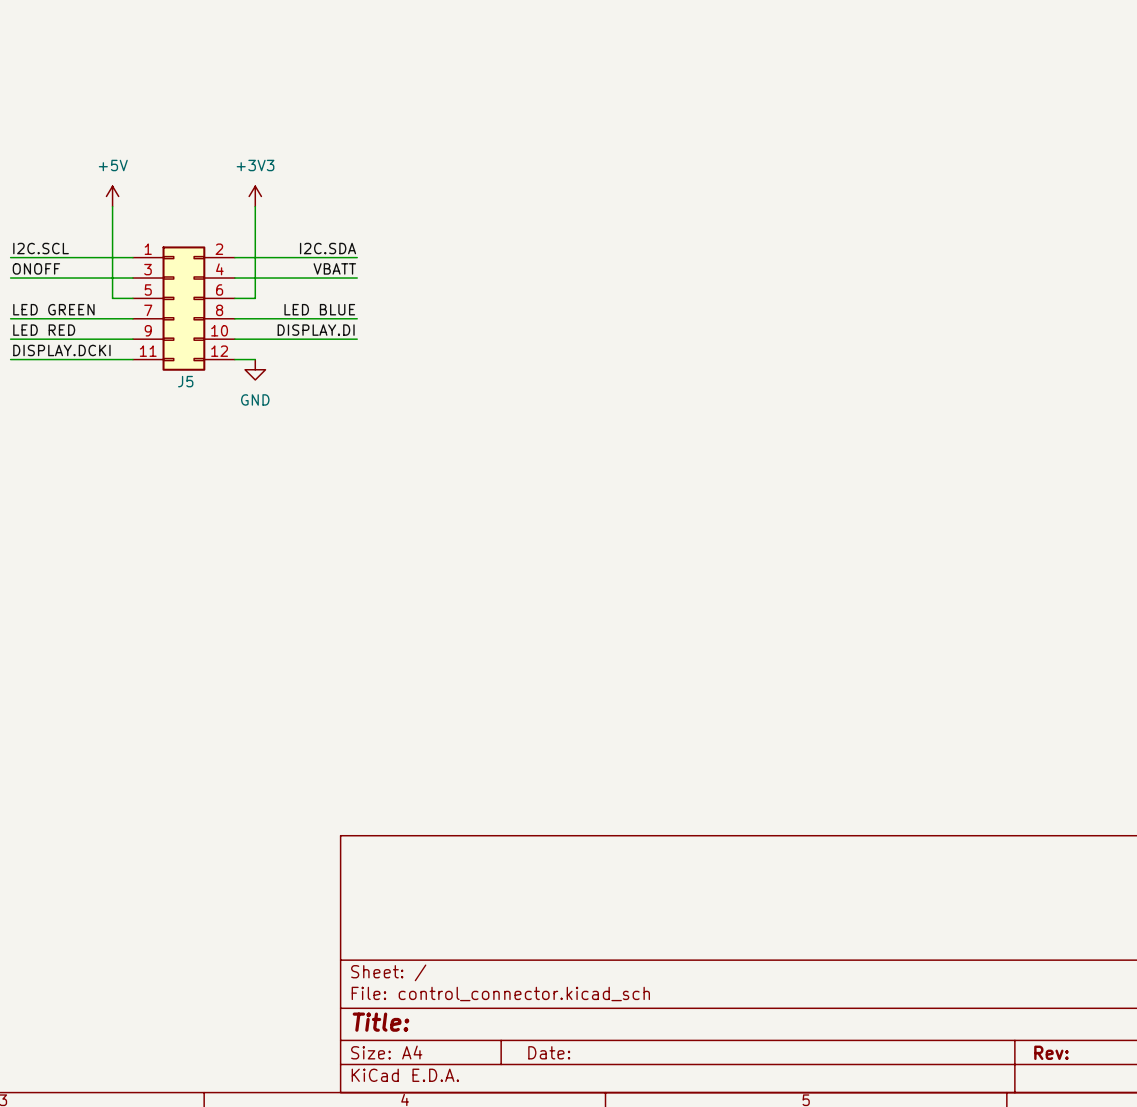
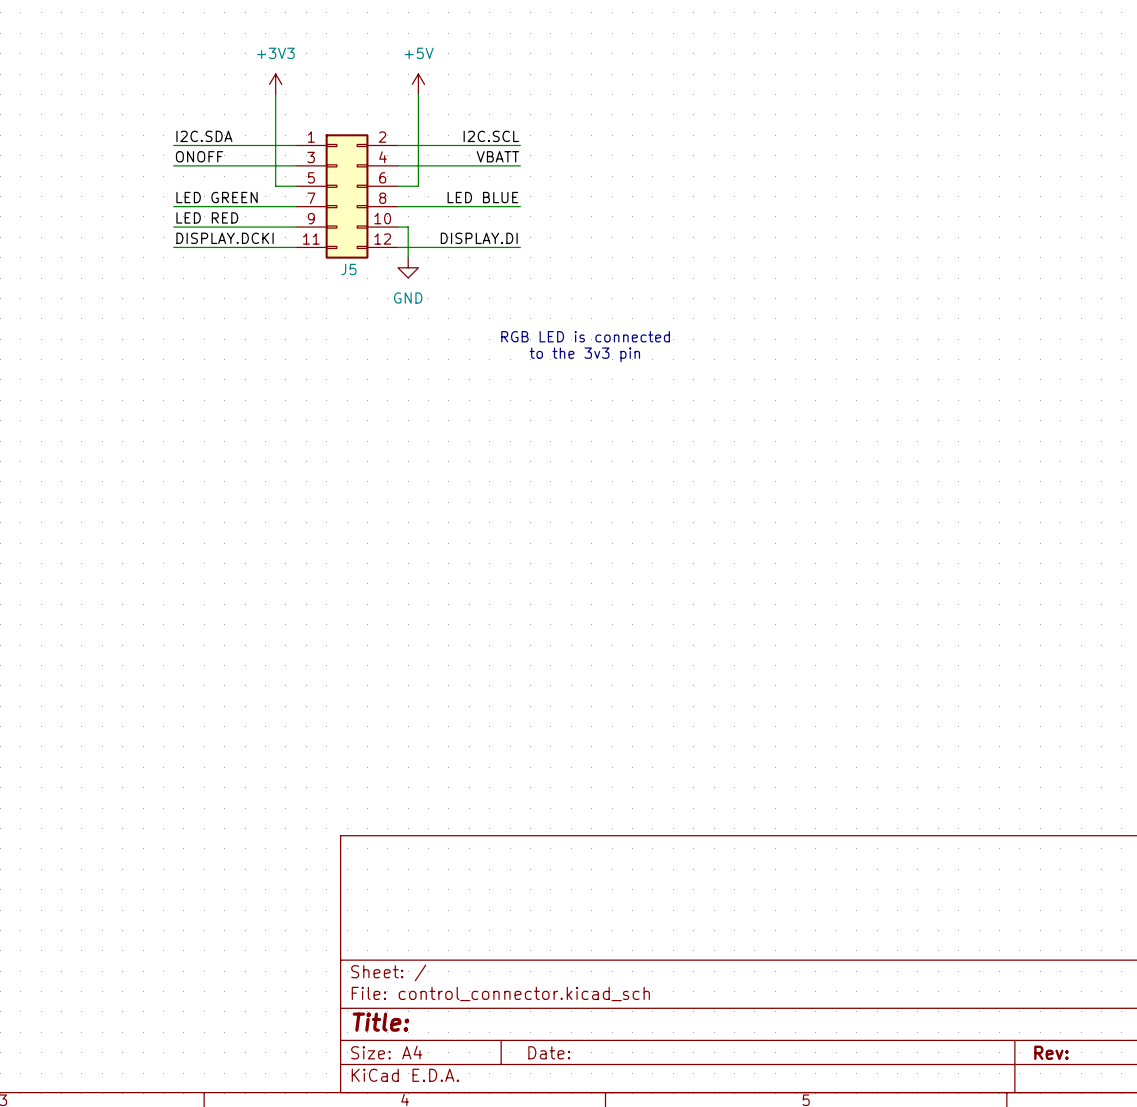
power symbol: none -> +5V (418, 84)
label: none -> I2C.SDA (204, 136)
label: none -> I2C.SCL (491, 136)
power symbol: +5V (112, 196) -> none
power symbol position: +3V3 (255, 196) -> +3V3 (275, 84)
wire: (112, 206) (112, 298) (132, 298) -> (275, 94) (275, 186) (296, 186)
wire: (255, 206) (255, 298) (234, 298) -> (418, 94) (418, 186) (398, 186)
wire: none -> (398, 227) (408, 227) (408, 257)
label: I2C.SCL (41, 248) -> none
label: I2C.SDA (328, 248) -> none
wire: (10, 257) (132, 257) -> (173, 145) (296, 145)
wire: (234, 257) (357, 257) -> (398, 145) (520, 145)
label position: ONOFF (36, 268) -> ONOFF (199, 156)
label position: VBATT (334, 268) -> VBATT (497, 156)
wire: (10, 278) (132, 278) -> (173, 165) (296, 165)
wire: (234, 278) (357, 278) -> (398, 165) (520, 165)
J5 position: (183, 308) -> (347, 196)
label position: LED GREEN (53, 309) -> LED GREEN (217, 197)
label position: LED BLUE (319, 309) -> LED BLUE (482, 197)
wire: (10, 318) (132, 318) -> (173, 206) (296, 206)
wire: (234, 318) (357, 318) -> (398, 206) (520, 206)
label position: LED RED (44, 330) -> LED RED (207, 217)
label position: DISPLAY.DI (316, 330) -> DISPLAY.DI (479, 238)
text: none -> RGB LED is connected (585, 336)
wire: (10, 339) (132, 339) -> (173, 227) (296, 227)
wire: (234, 339) (357, 339) -> (398, 247) (520, 247)
label position: DISPLAY.DCKI (61, 350) -> DISPLAY.DCKI (225, 238)
text: none -> to the 3v3 pin (584, 354)
wire: (10, 359) (132, 359) -> (173, 247) (296, 247)
wire: (234, 359) (255, 359) -> none
power symbol position: GND (255, 369) -> GND (408, 267)

